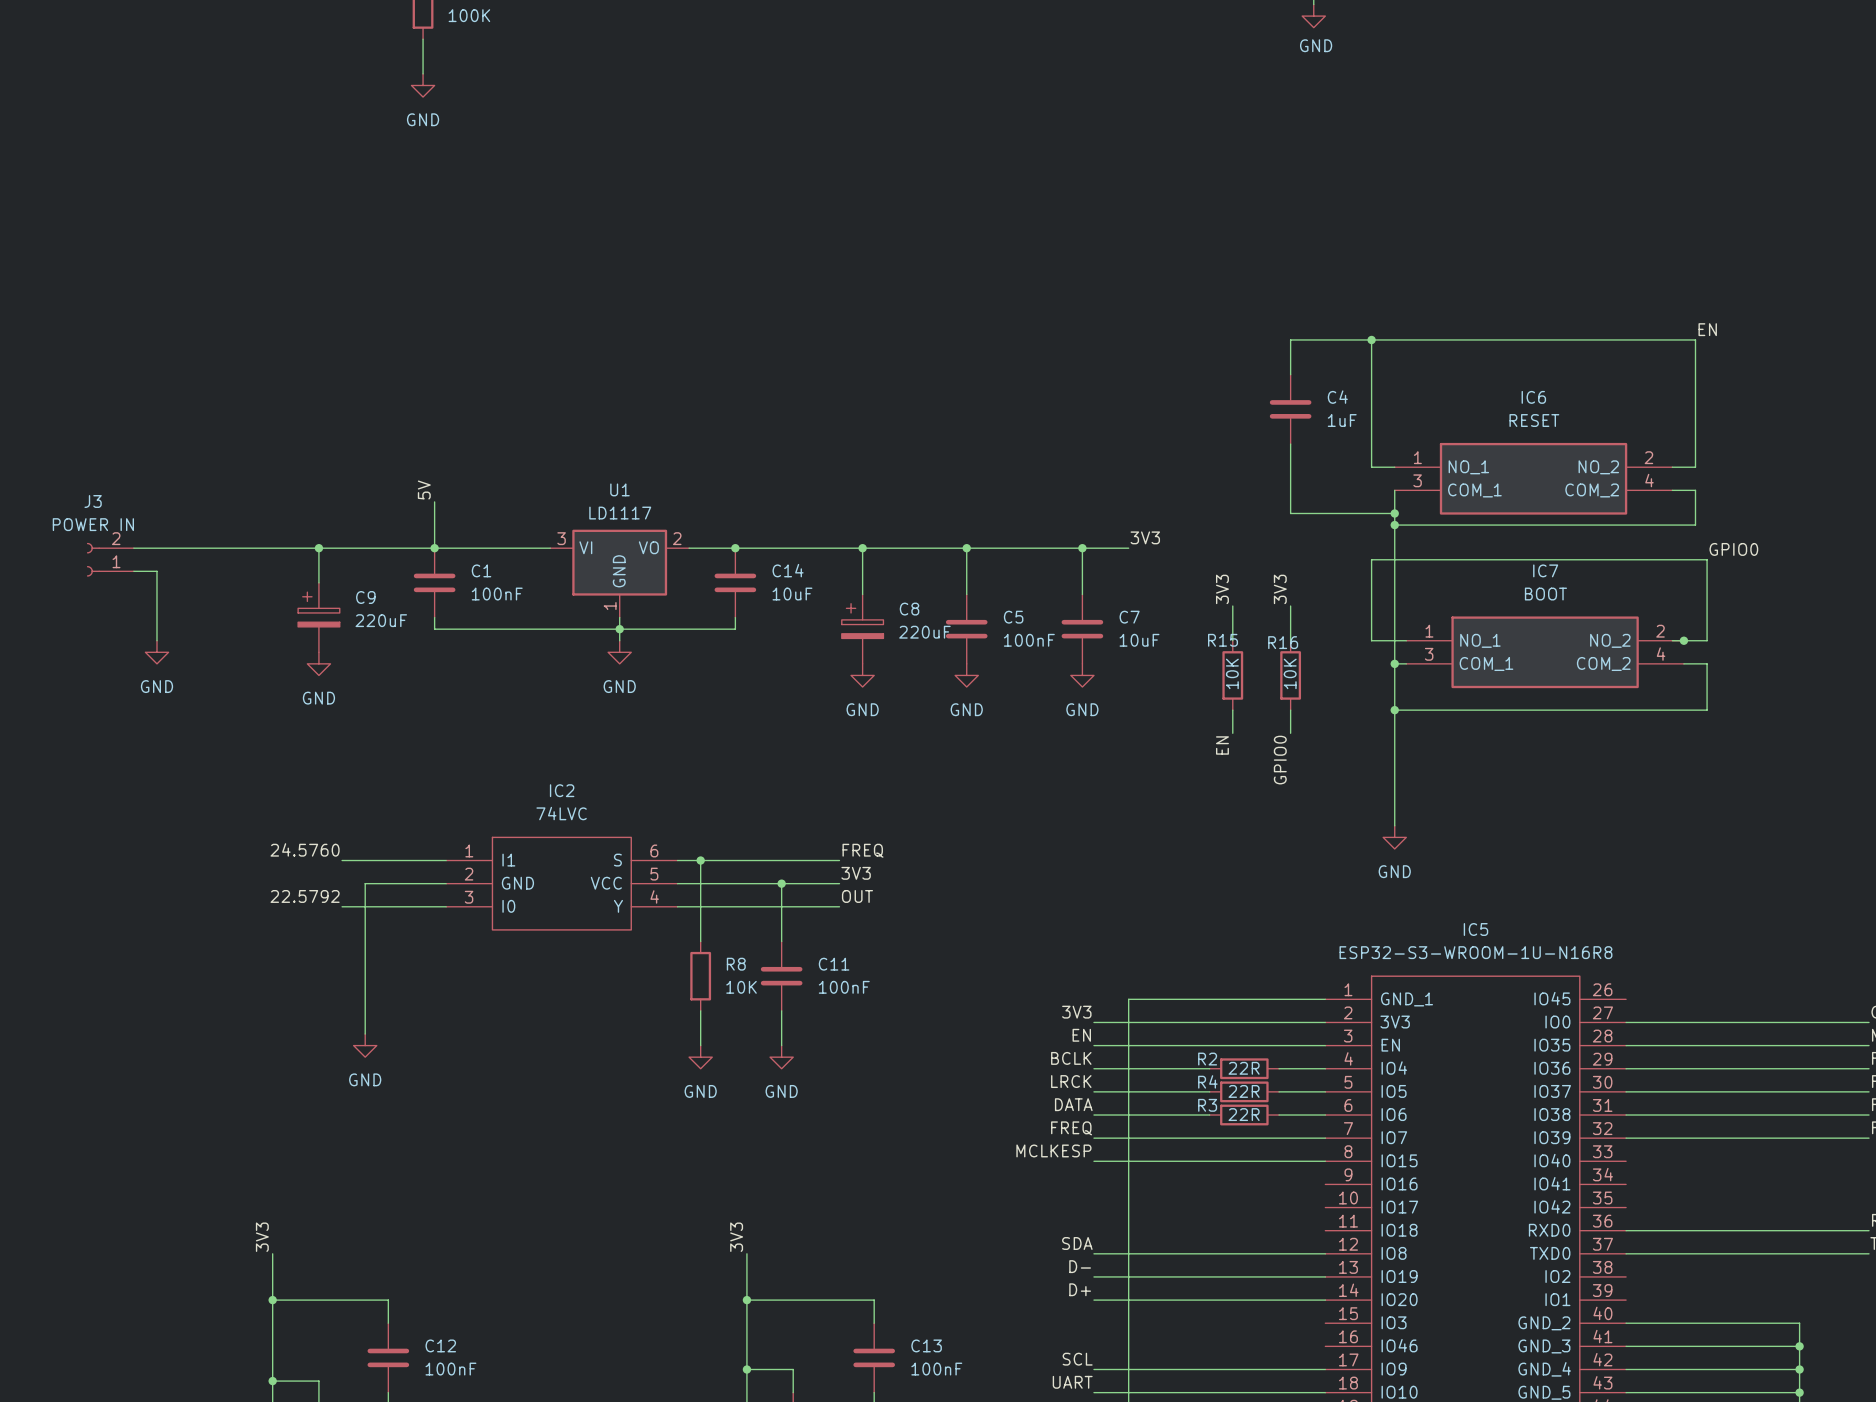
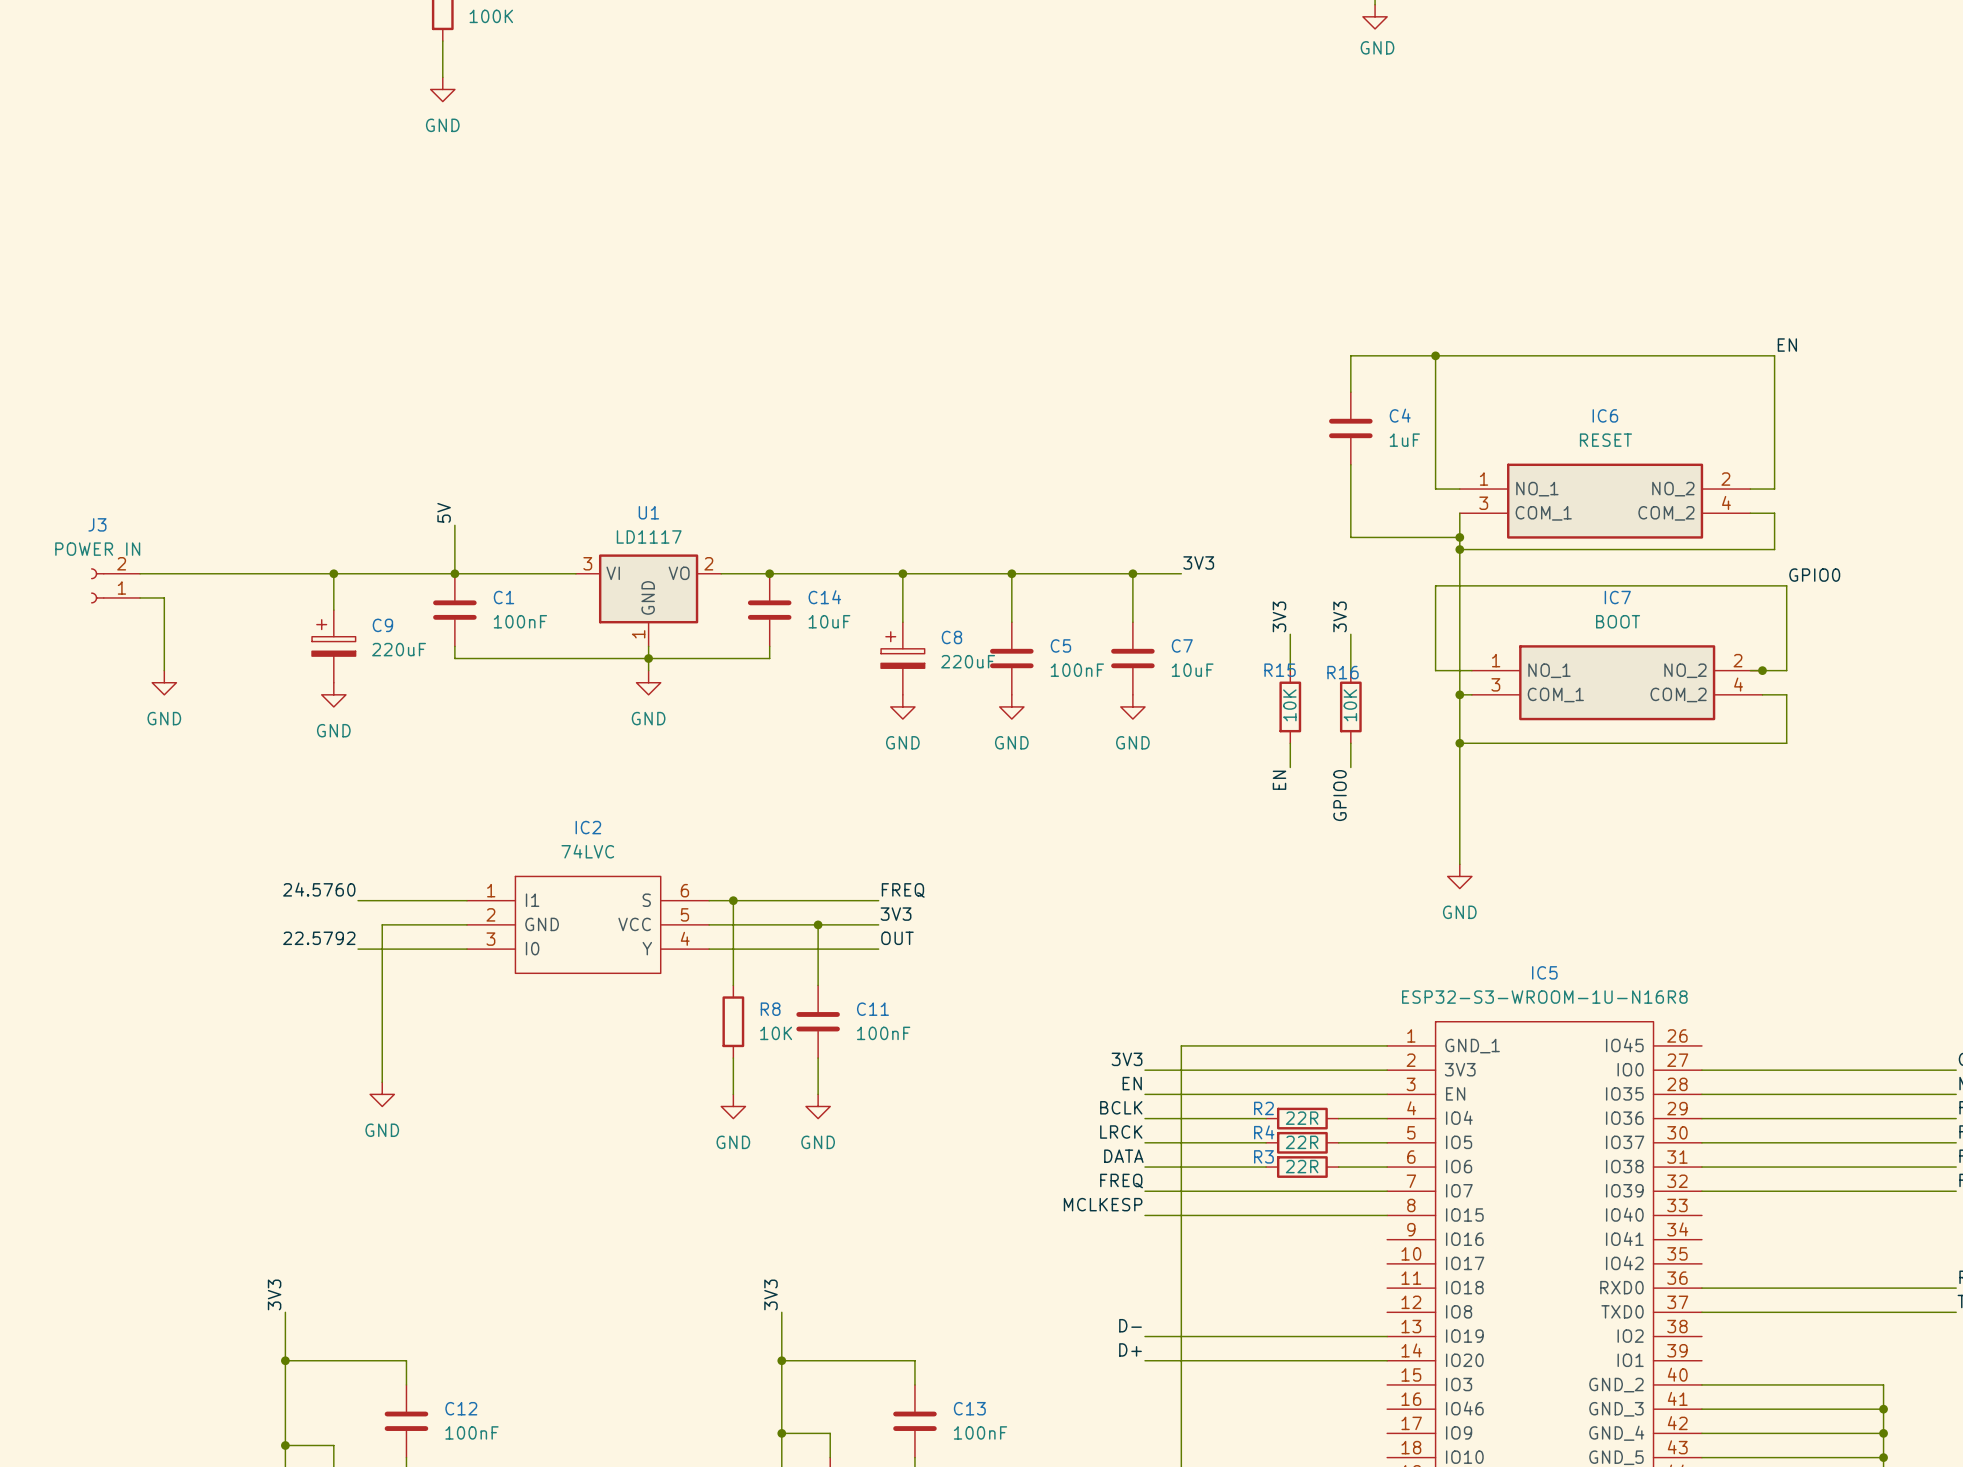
label: SDA (1077, 1243) -> none
wire: (1093, 1253) (1325, 1253) -> none
label: SCL (1077, 1359) -> none
wire: (1093, 1369) (1325, 1369) -> none
label: UART (1072, 1382) -> none
wire: (1093, 1392) (1325, 1392) -> none

